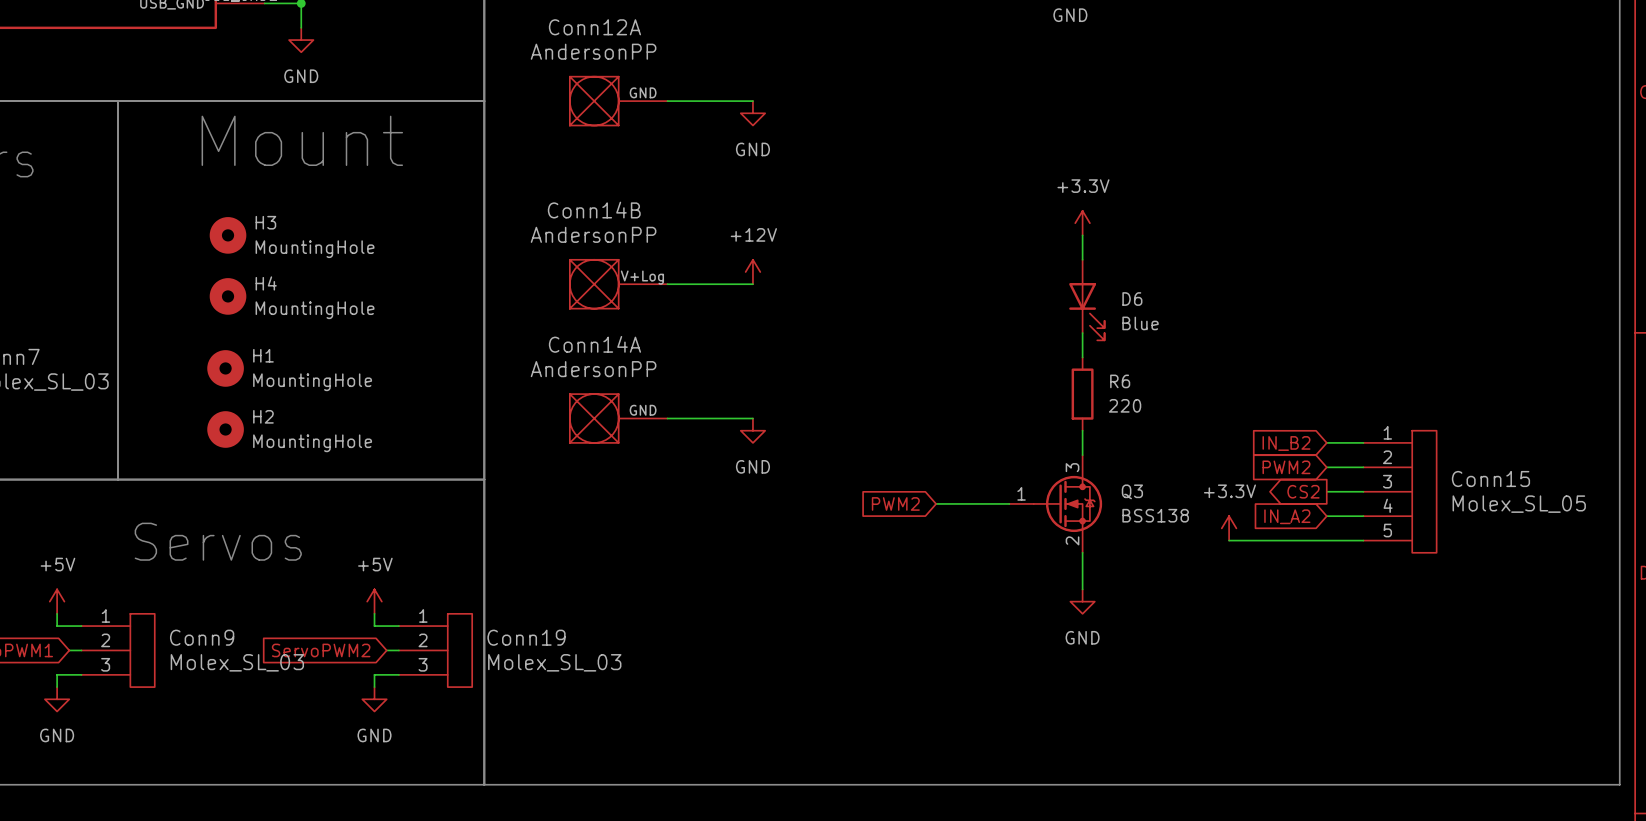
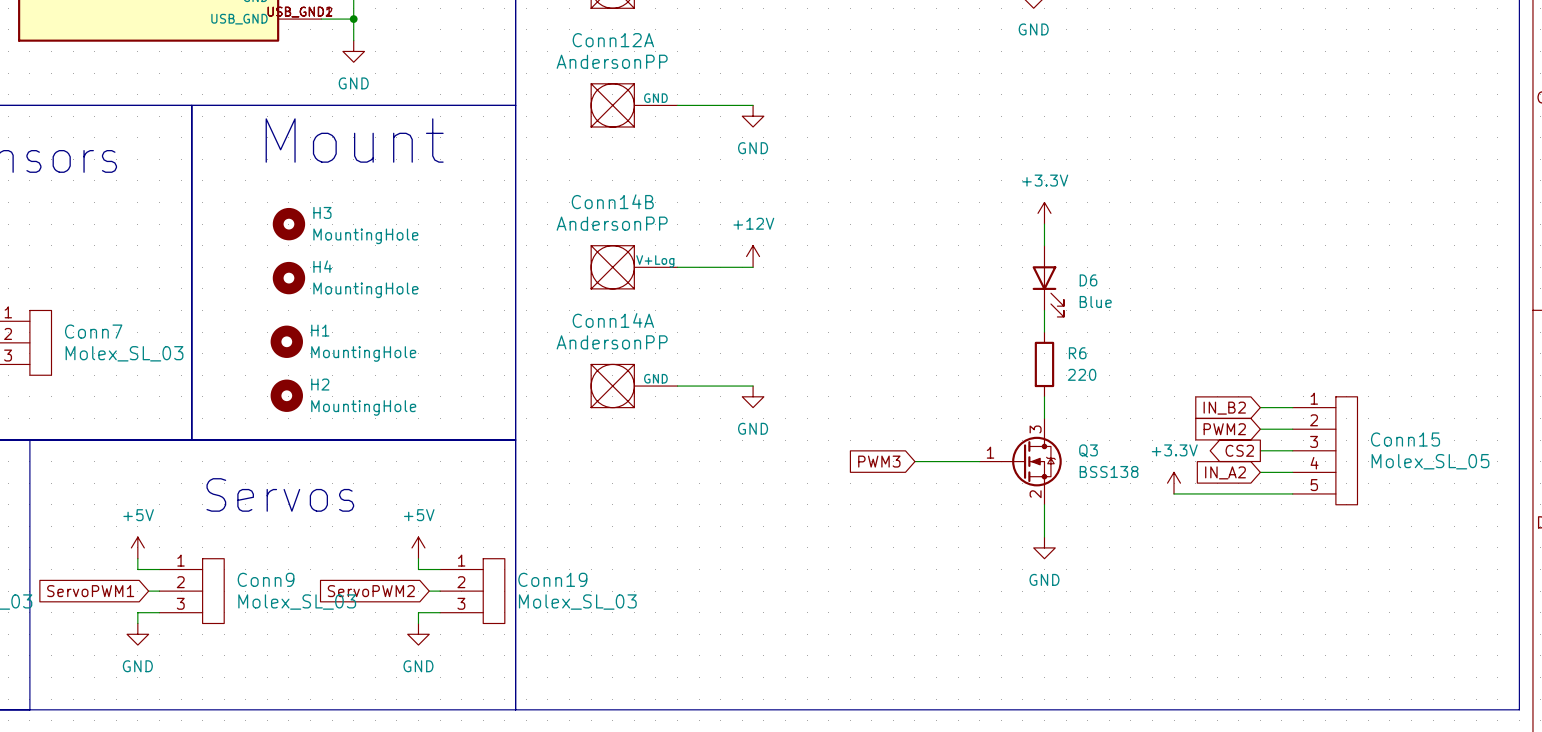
global label: PWM2 (895, 503) -> PWM3 (879, 461)

